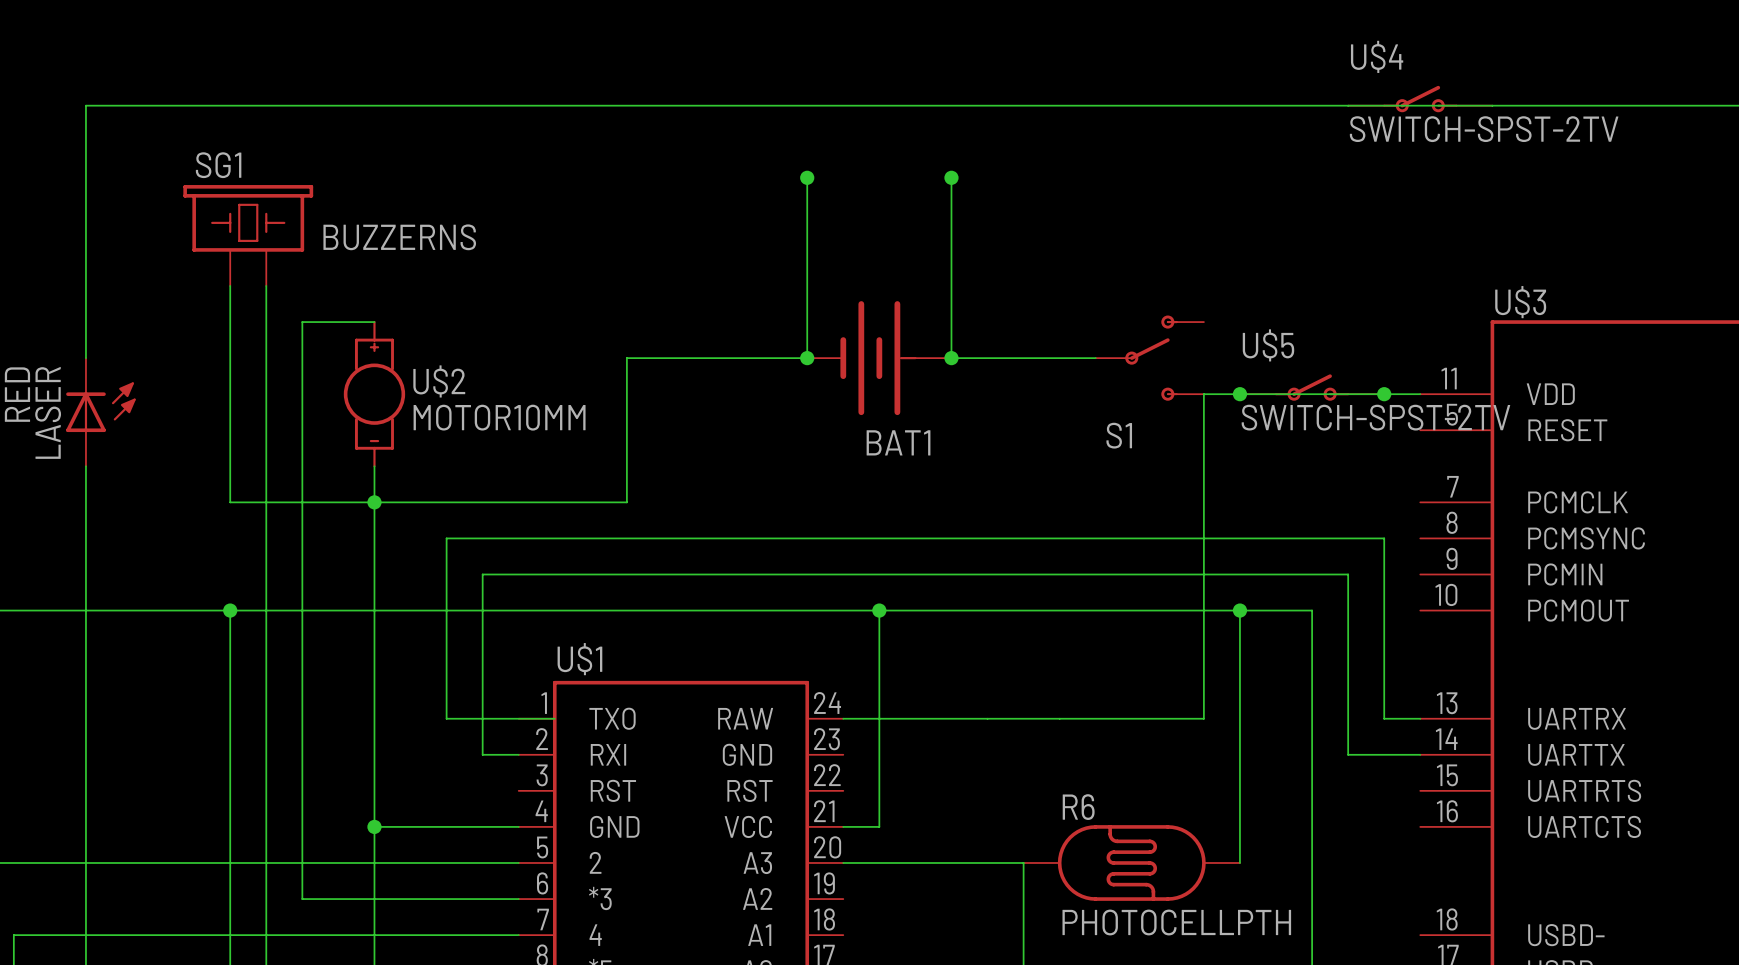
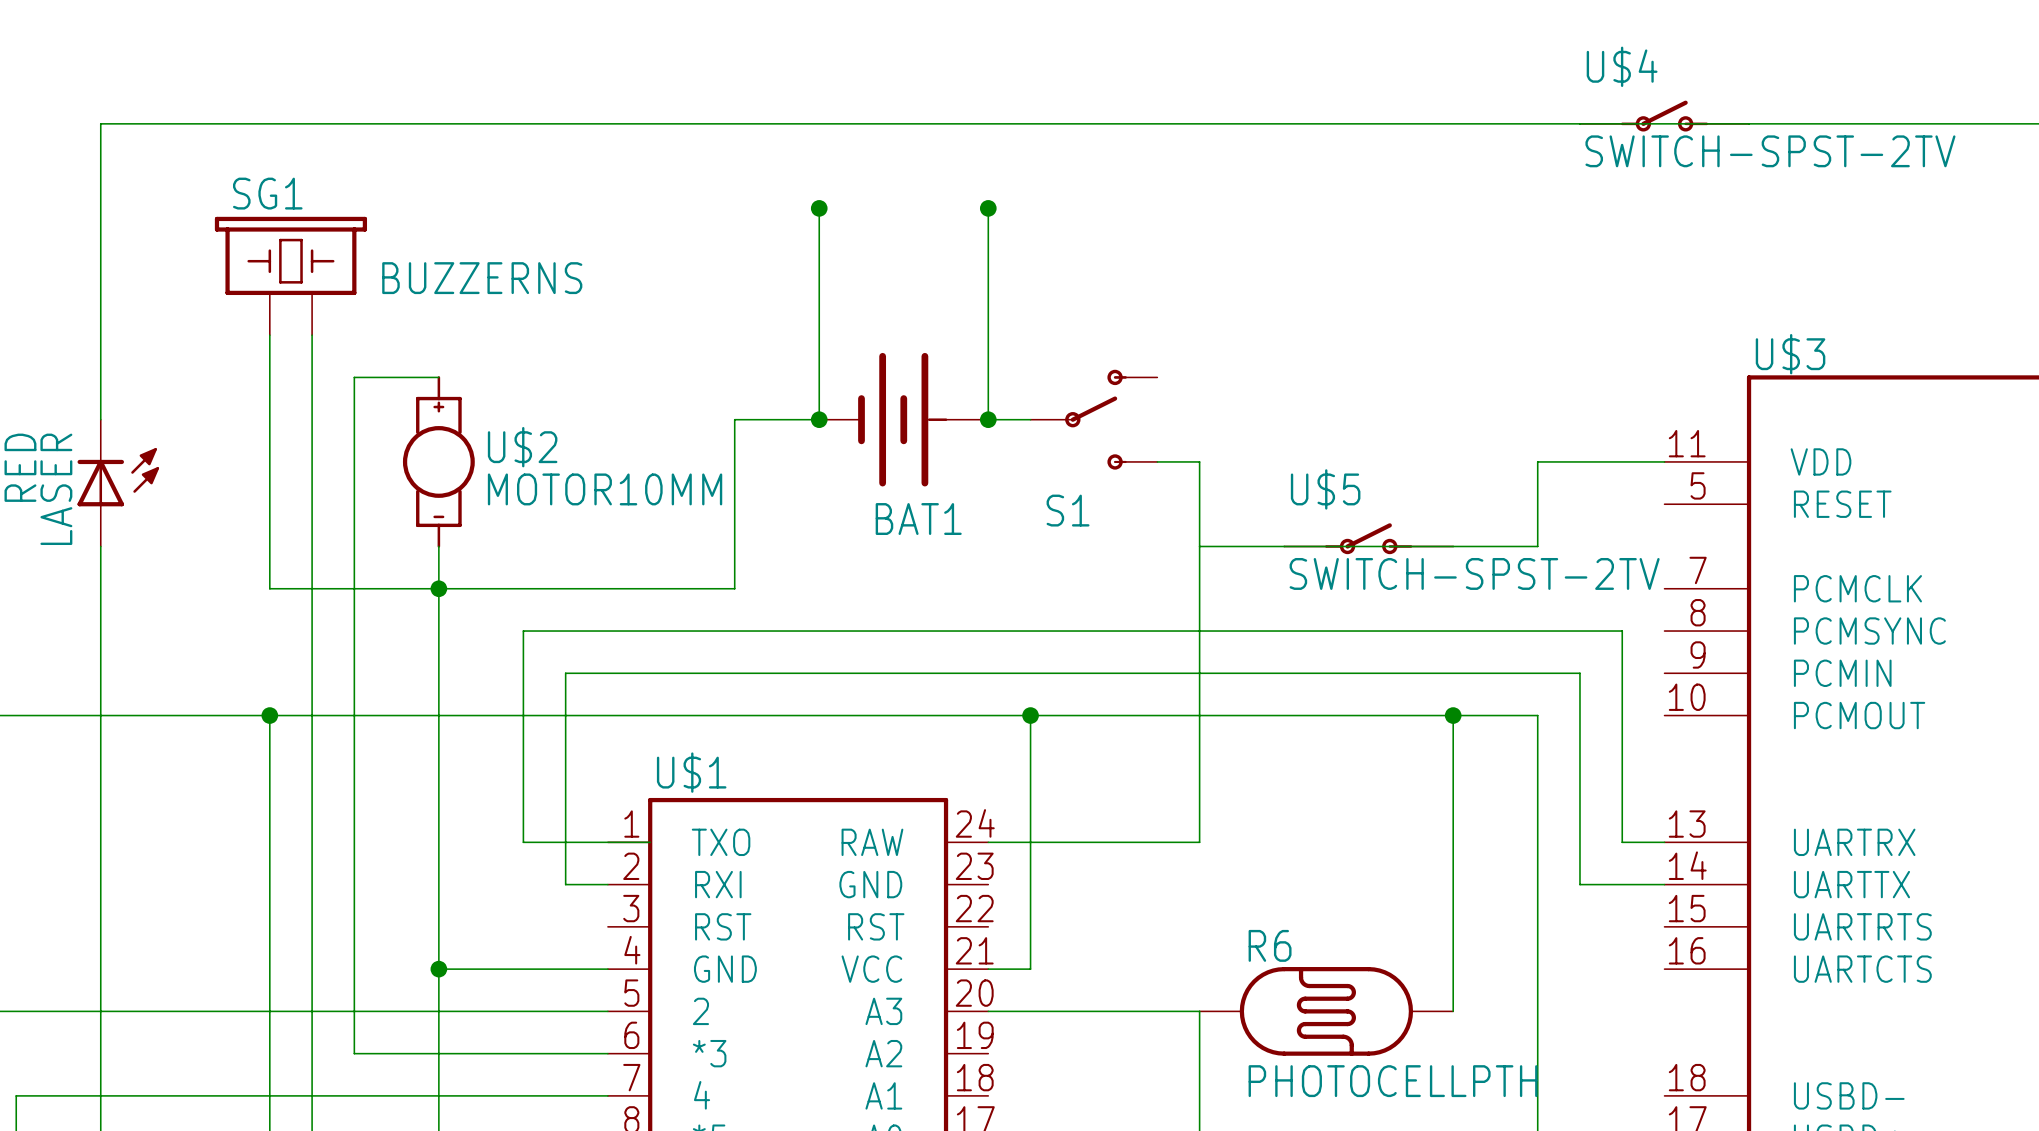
junction: none -> (819, 208)
wire: (807, 177) (807, 358) (699, 358) -> (819, 208) (819, 419)
junction position: (807, 177) -> (988, 208)
wire: none -> (988, 208) (988, 419) (1030, 419)
wire: (951, 177) (951, 358) (1095, 358) -> none
junction: (951, 177) -> none
junction: none -> (819, 419)
junction position: (807, 358) -> (988, 419)
BAT1 position: (879, 358) -> (903, 419)
junction: (951, 358) -> none
S1 position: (1149, 358) -> (1093, 419)
U$5 position: (1312, 387) -> (1368, 538)
wire: none -> (1157, 461) (1199, 461) (1199, 842)
junction: (1239, 394) -> none
wire: (1312, 394) (1203, 394) (1203, 718) (1023, 718) -> (1537, 461) (1537, 546) (1199, 546)
junction: (1384, 394) -> none

